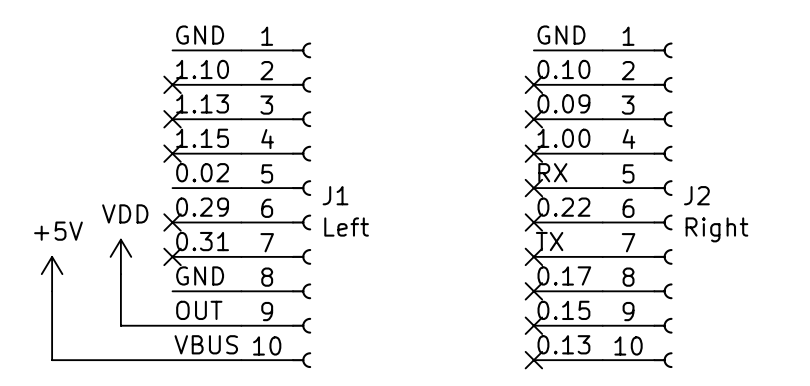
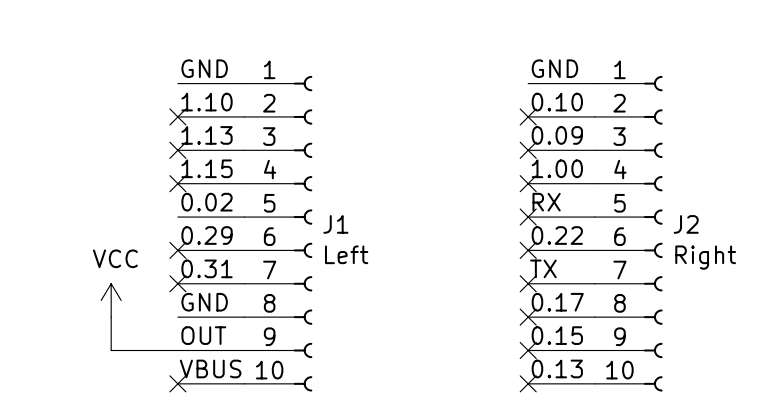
power symbol: VDD (120, 256) -> none
power symbol: +5V (52, 274) -> none
power symbol: none -> VCC (111, 300)
wire: (120, 274) (120, 325) -> (111, 317) (111, 350) (127, 350)
wire: (52, 291) (52, 360) (172, 360) -> none
no-connect mark: none -> (177, 383)

